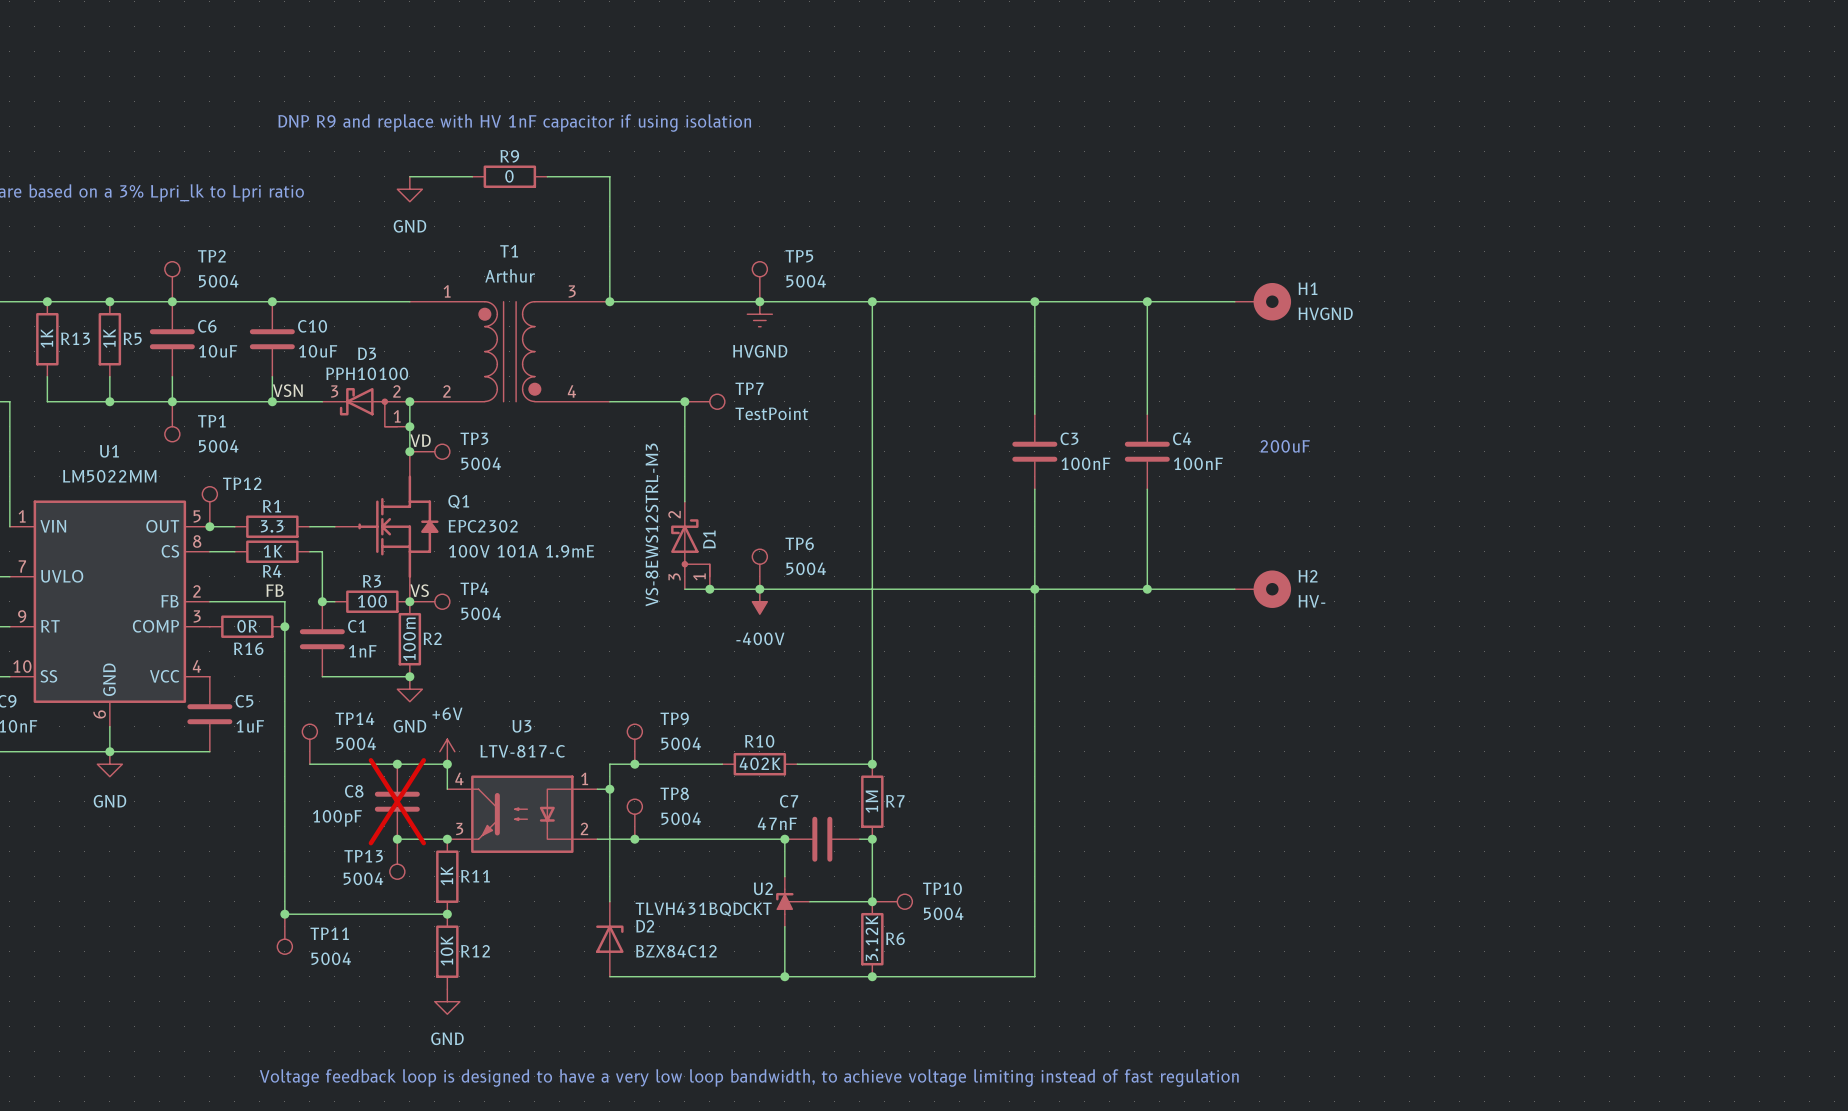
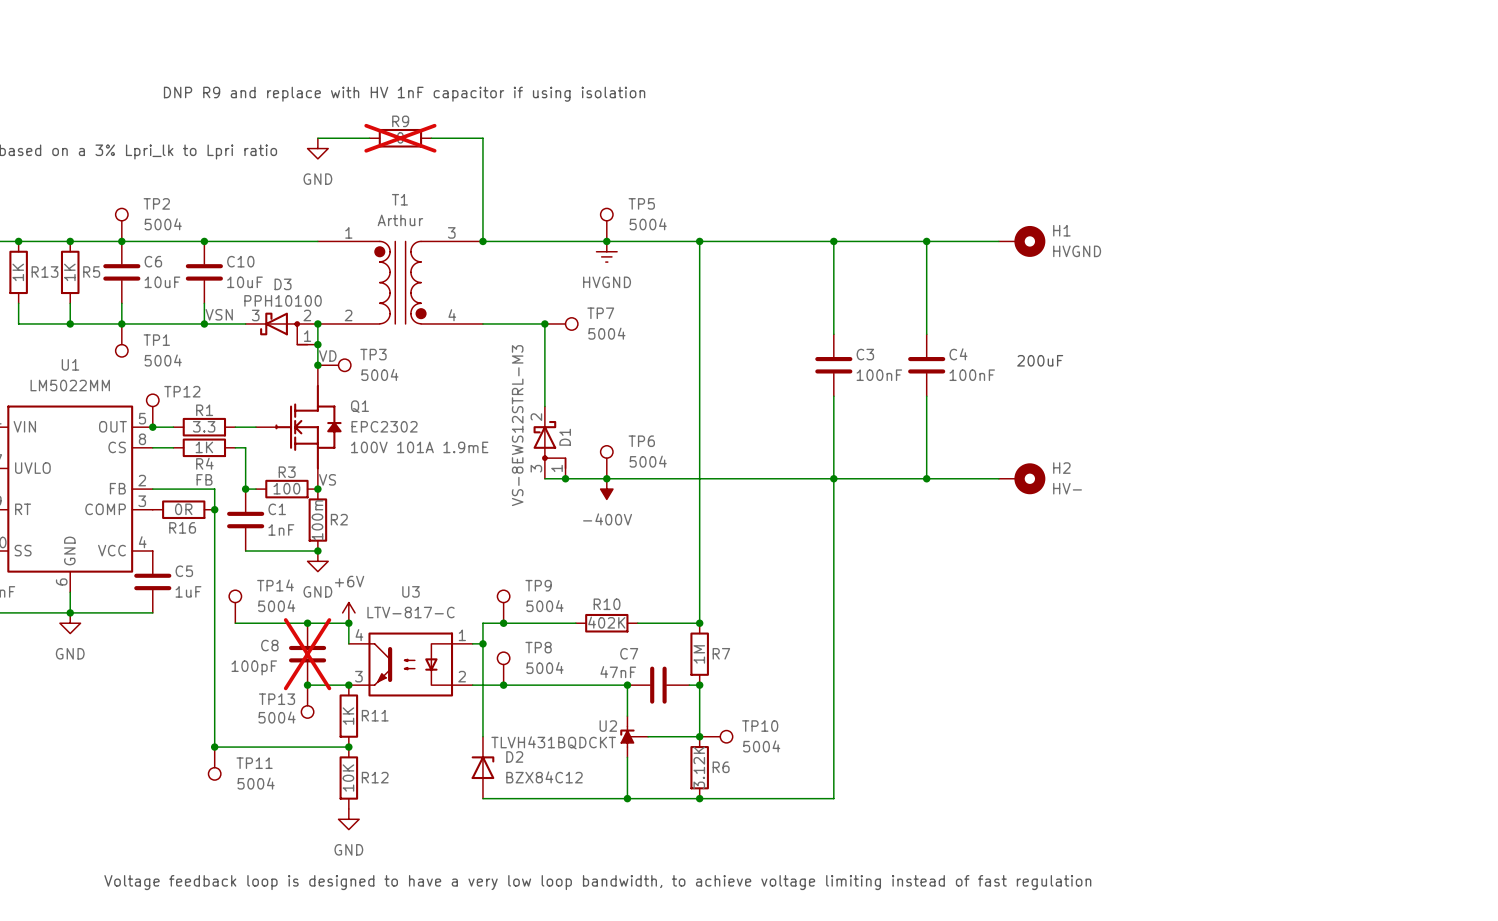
R9 do-not-place cross: none -> (400, 138)
TP7 value: TestPoint (771, 413) -> 5004 (606, 333)
TP4: 5004 (429, 601) -> none

